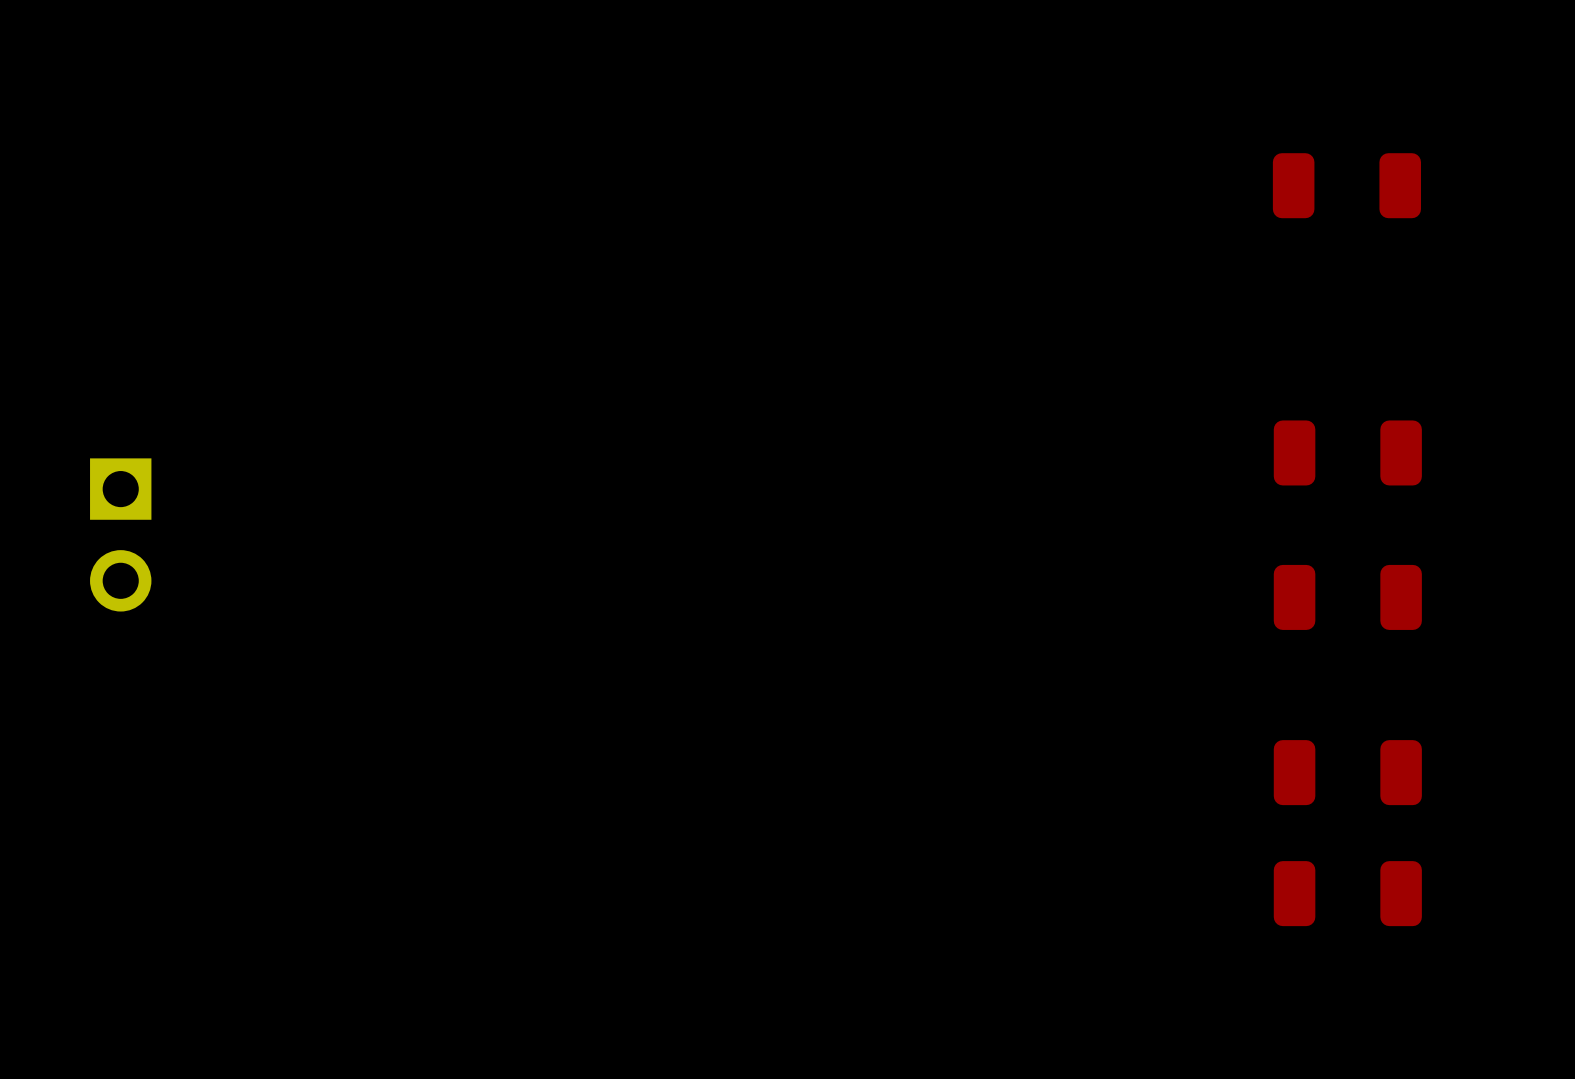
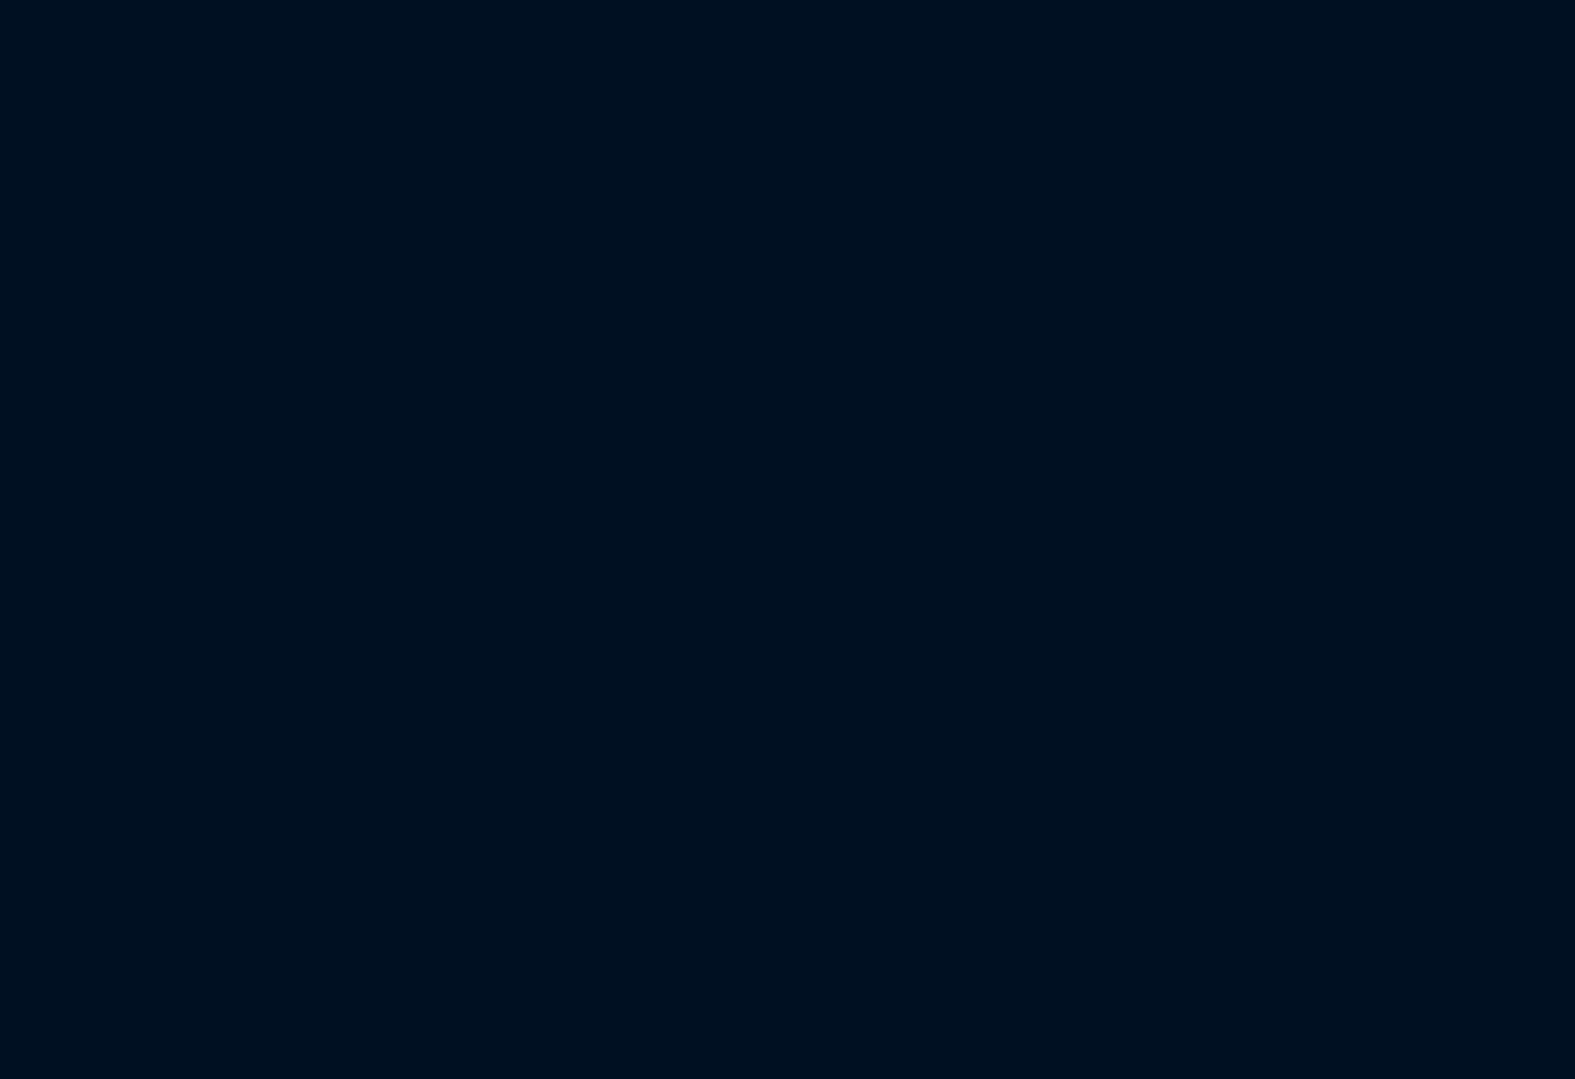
part: (1346, 185) -> none
part: (1347, 452) -> none
part: (120, 534) -> none
part: (1347, 597) -> none
part: (1347, 772) -> none
part: (1347, 893) -> none

